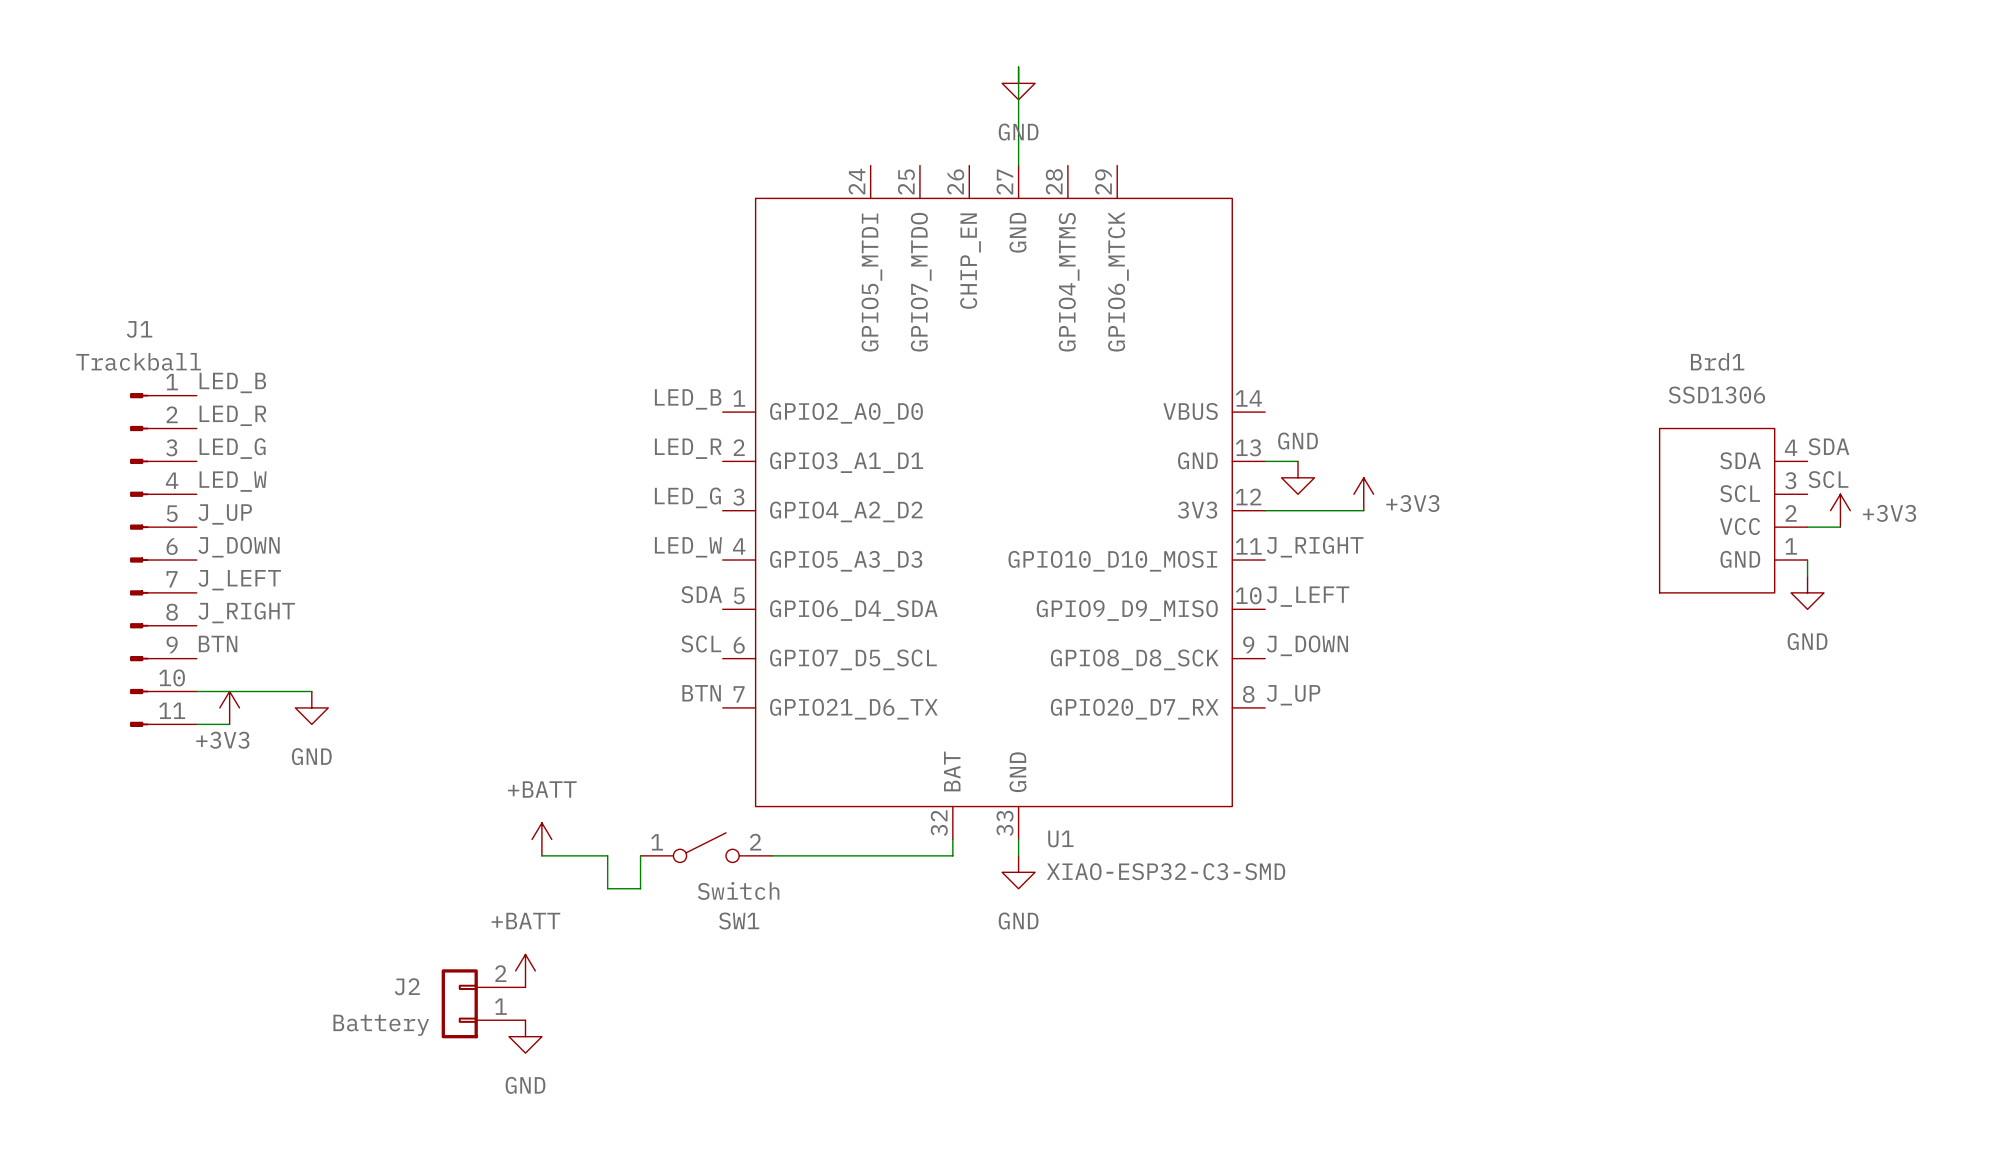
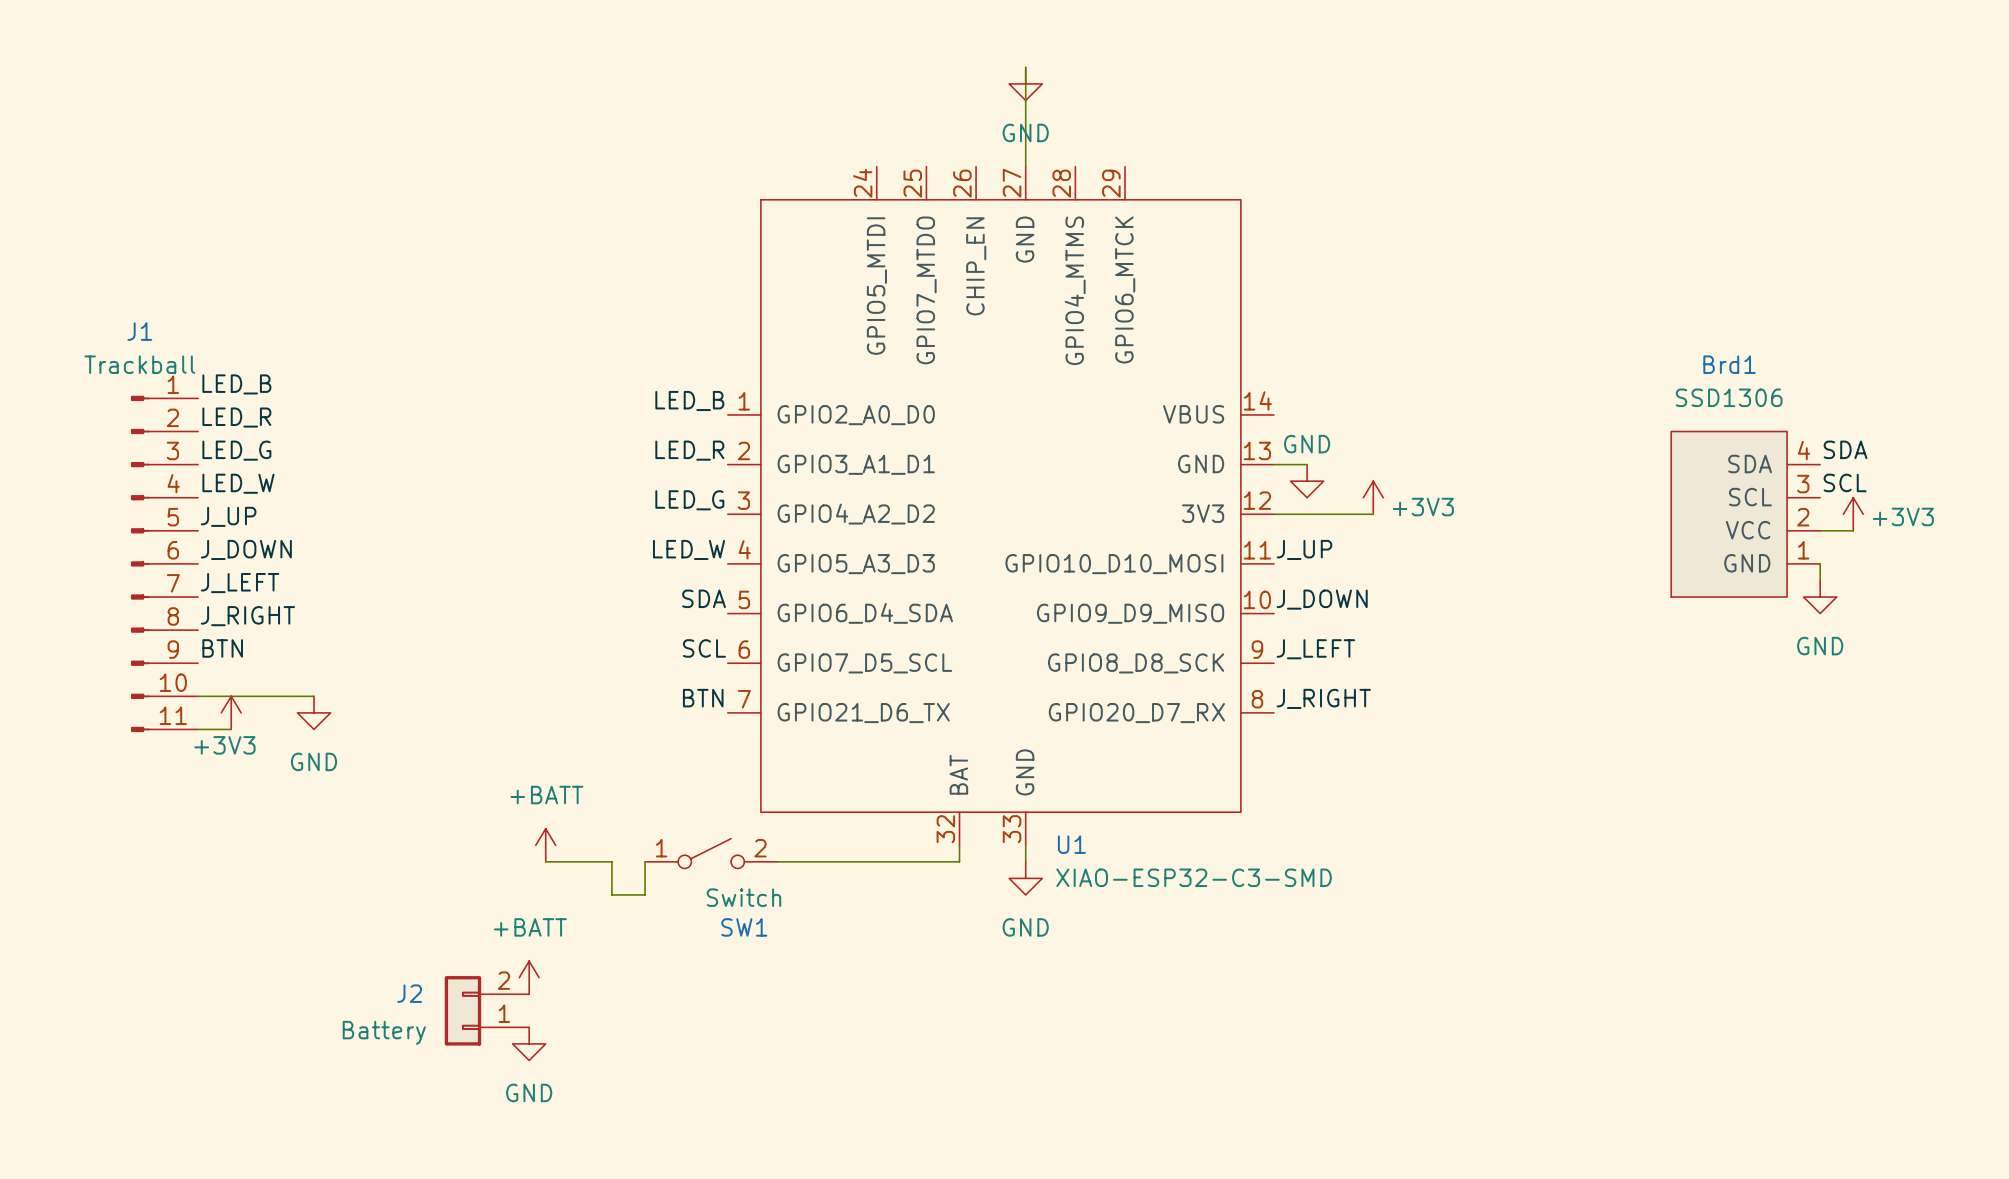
label: J_RIGHT (1315, 547) -> J_UP (1304, 549)
label: J_LEFT (1308, 596) -> J_DOWN (1322, 599)
label: J_DOWN (1307, 645) -> J_LEFT (1315, 649)
label: J_UP (1293, 695) -> J_RIGHT (1323, 698)

